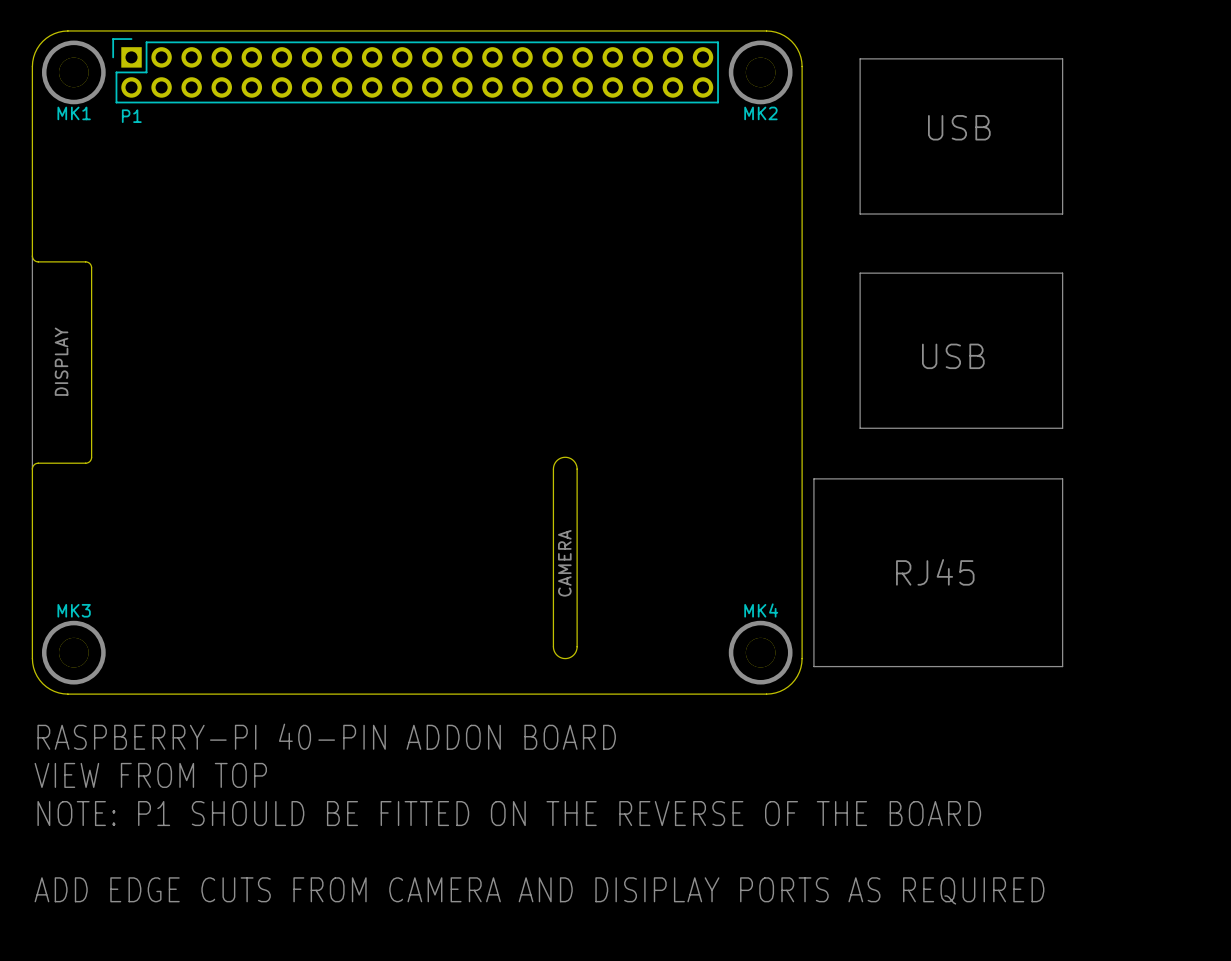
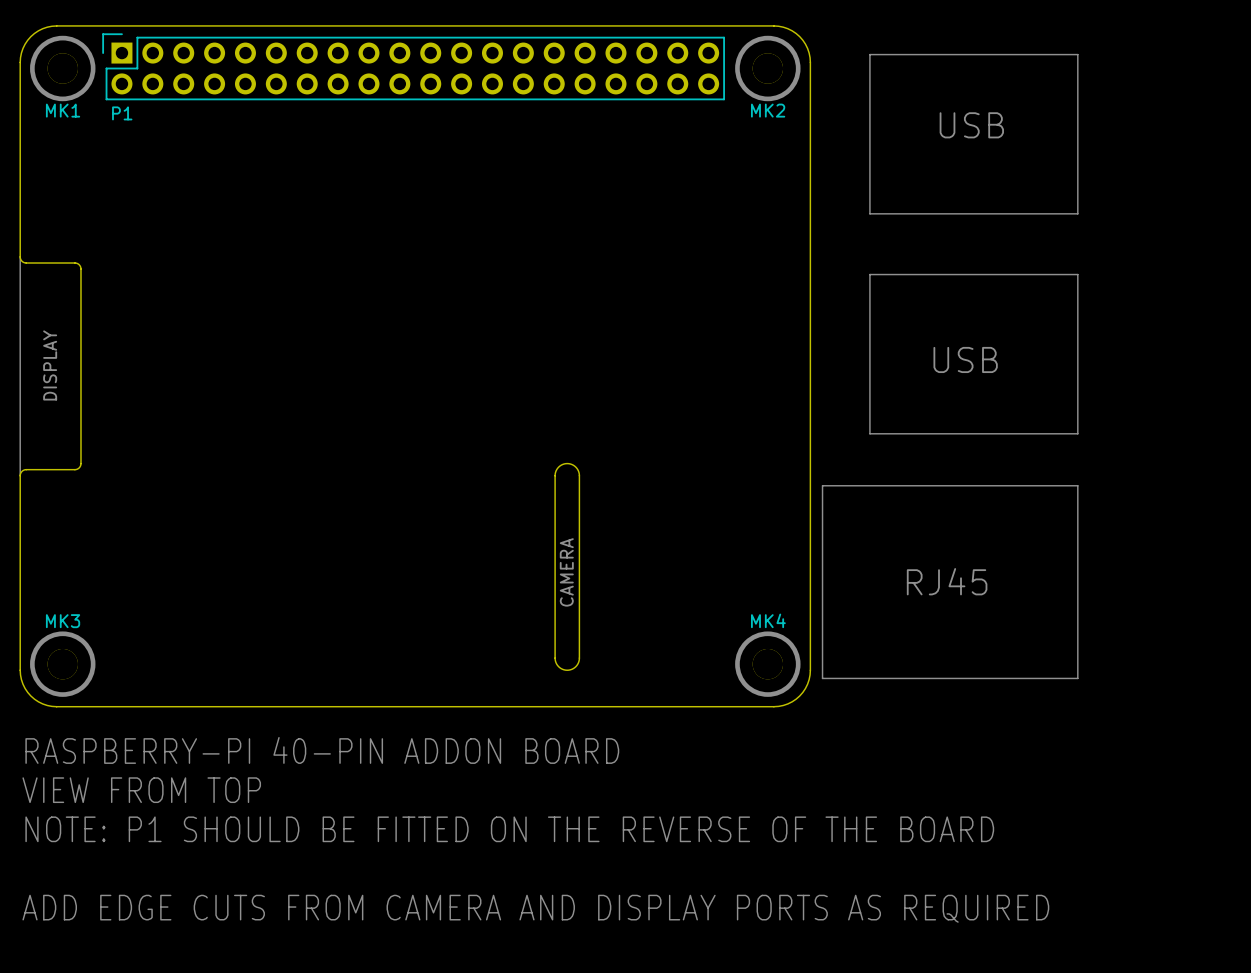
text: ADD EDGE CUTS FROM CAMERA AND DISIPLAY PORTS AS REQUIRED (539, 890) -> ADD EDGE CUTS FROM CAMERA AND DISPLAY PORTS AS REQUIRED (535, 908)

